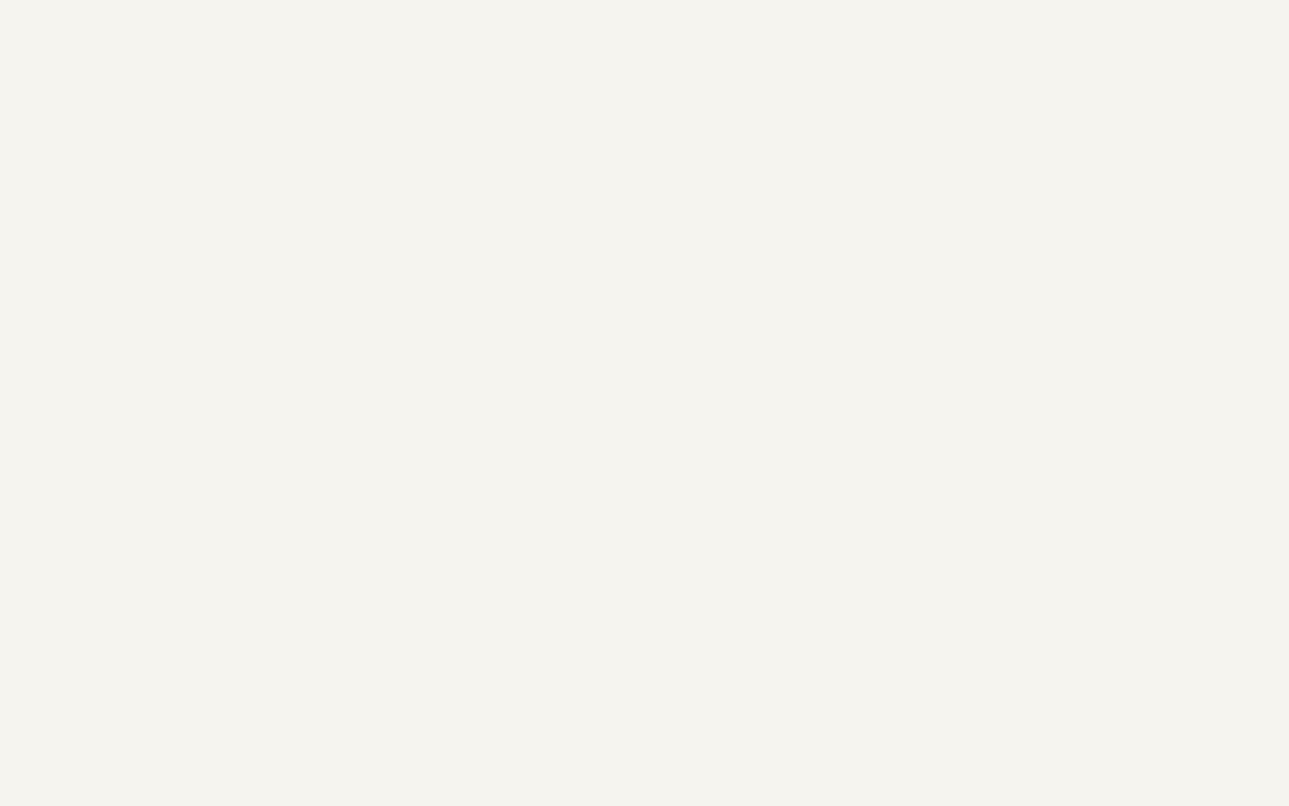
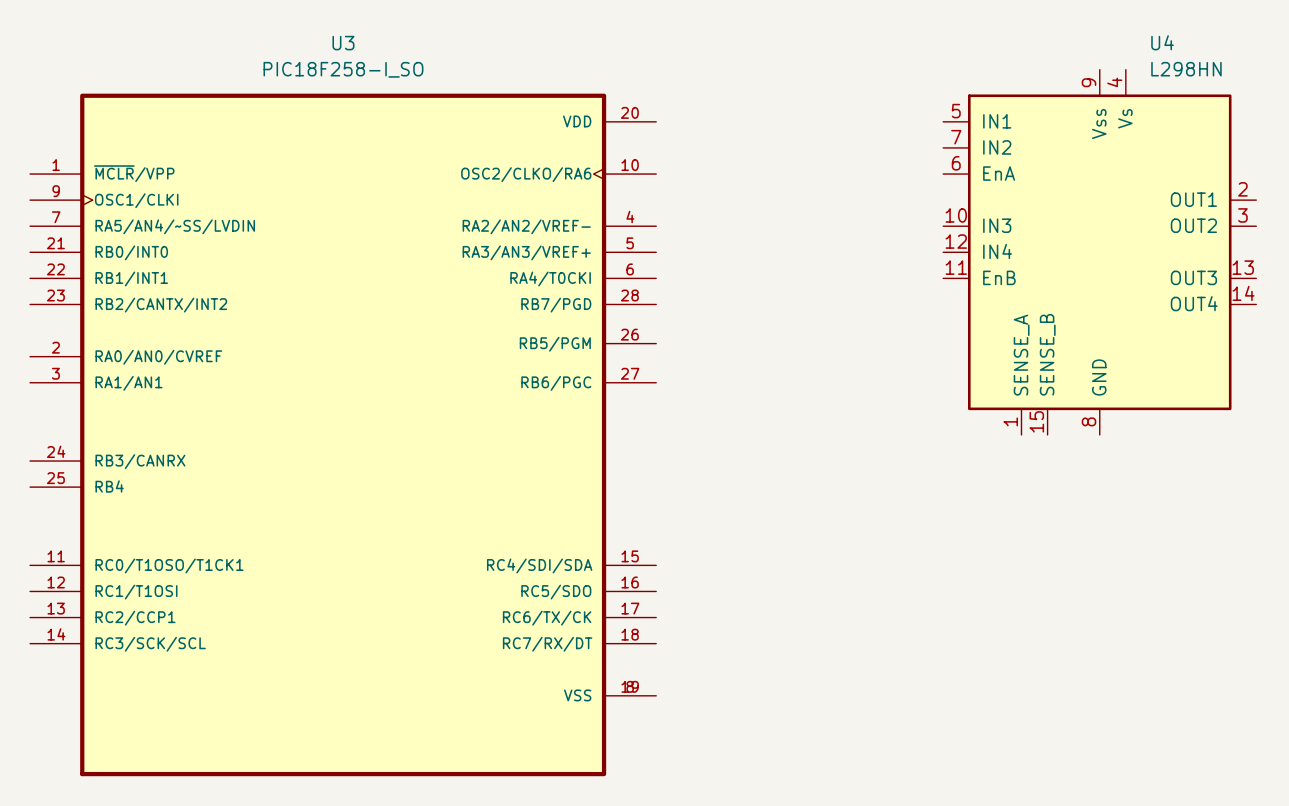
U4: none -> L298HN (1099, 252)
U3: none -> PIC18F258-I_SO (343, 434)

